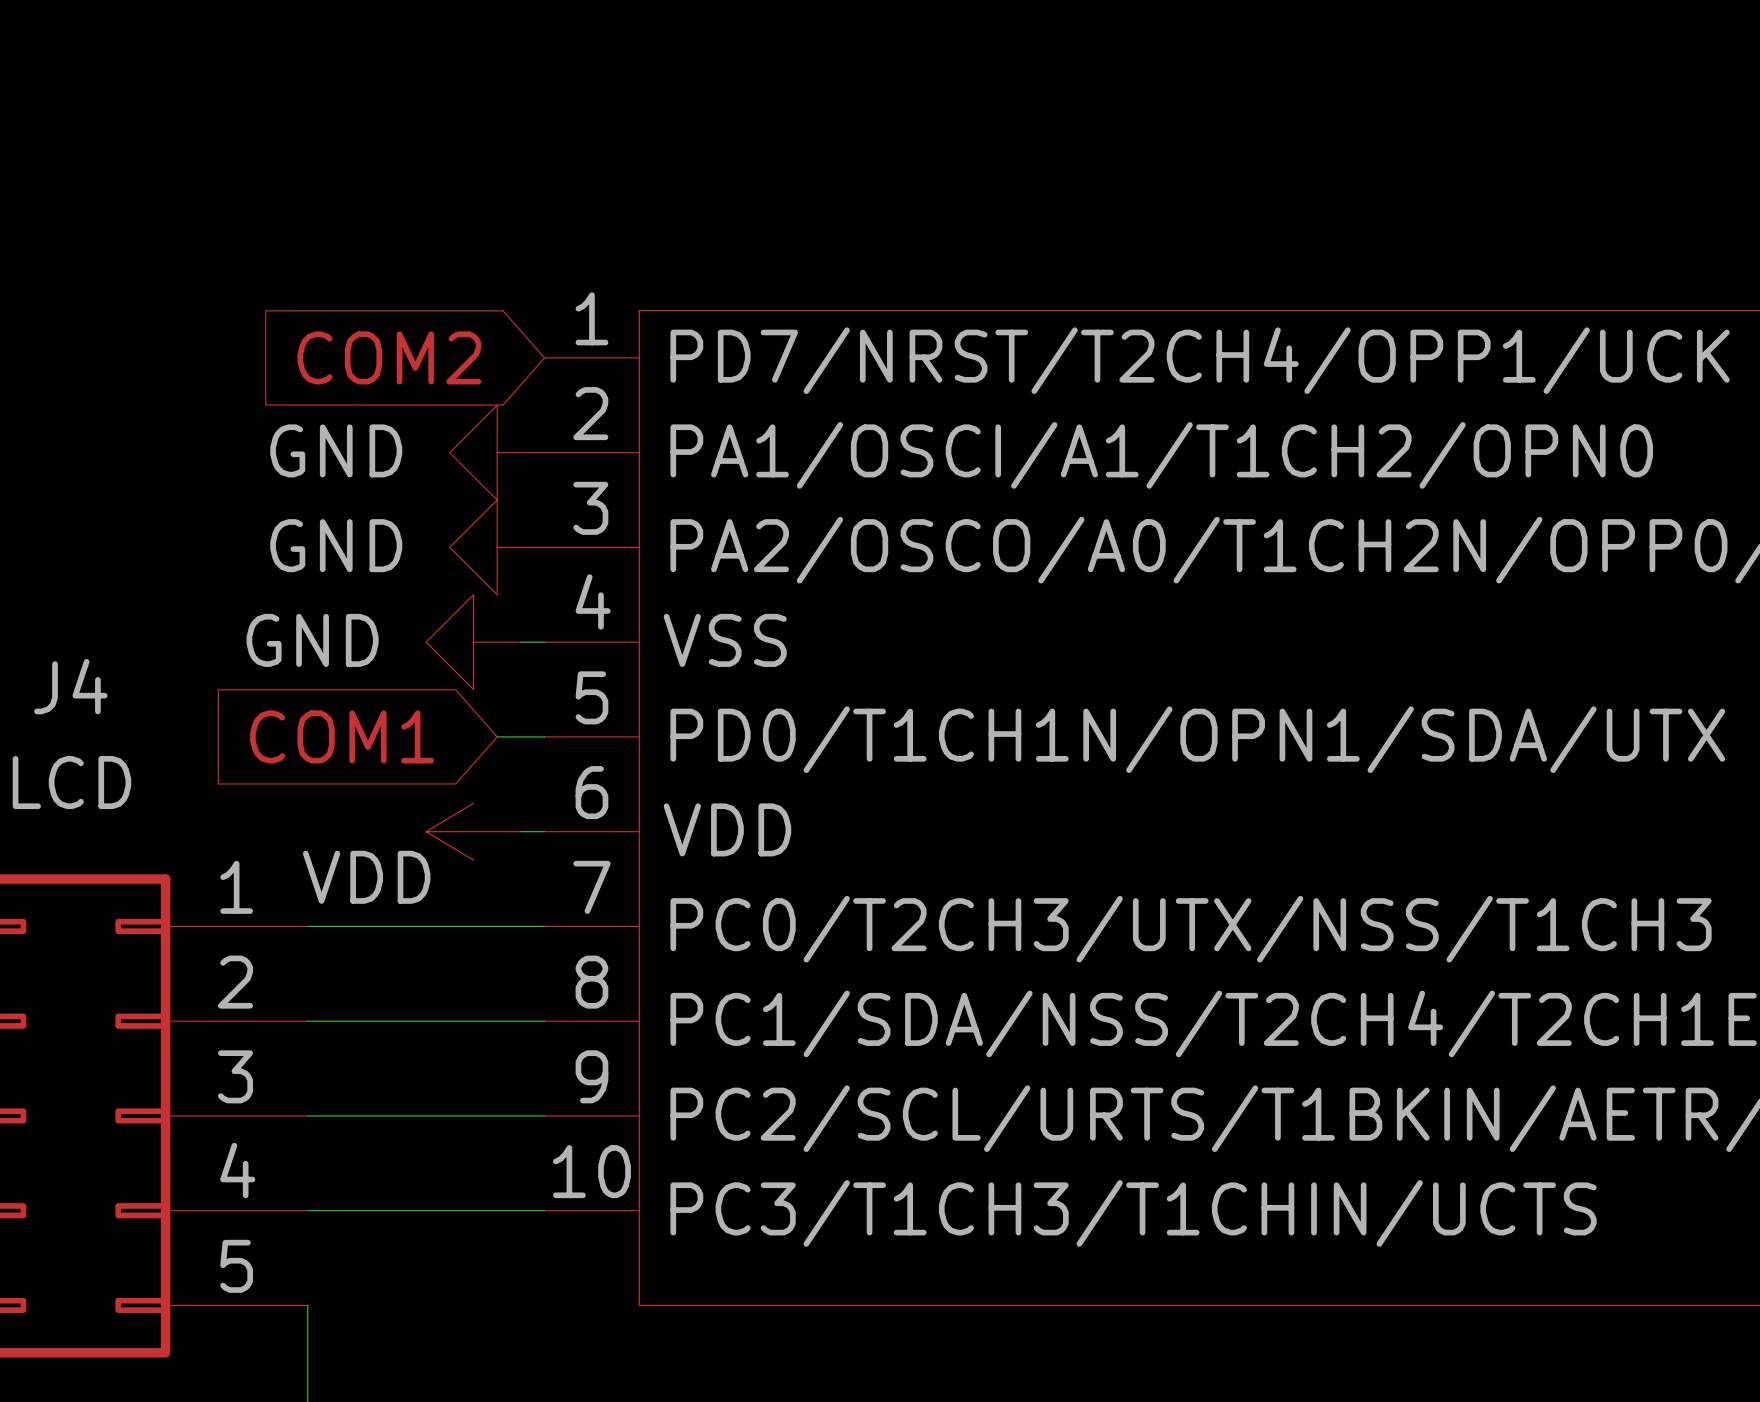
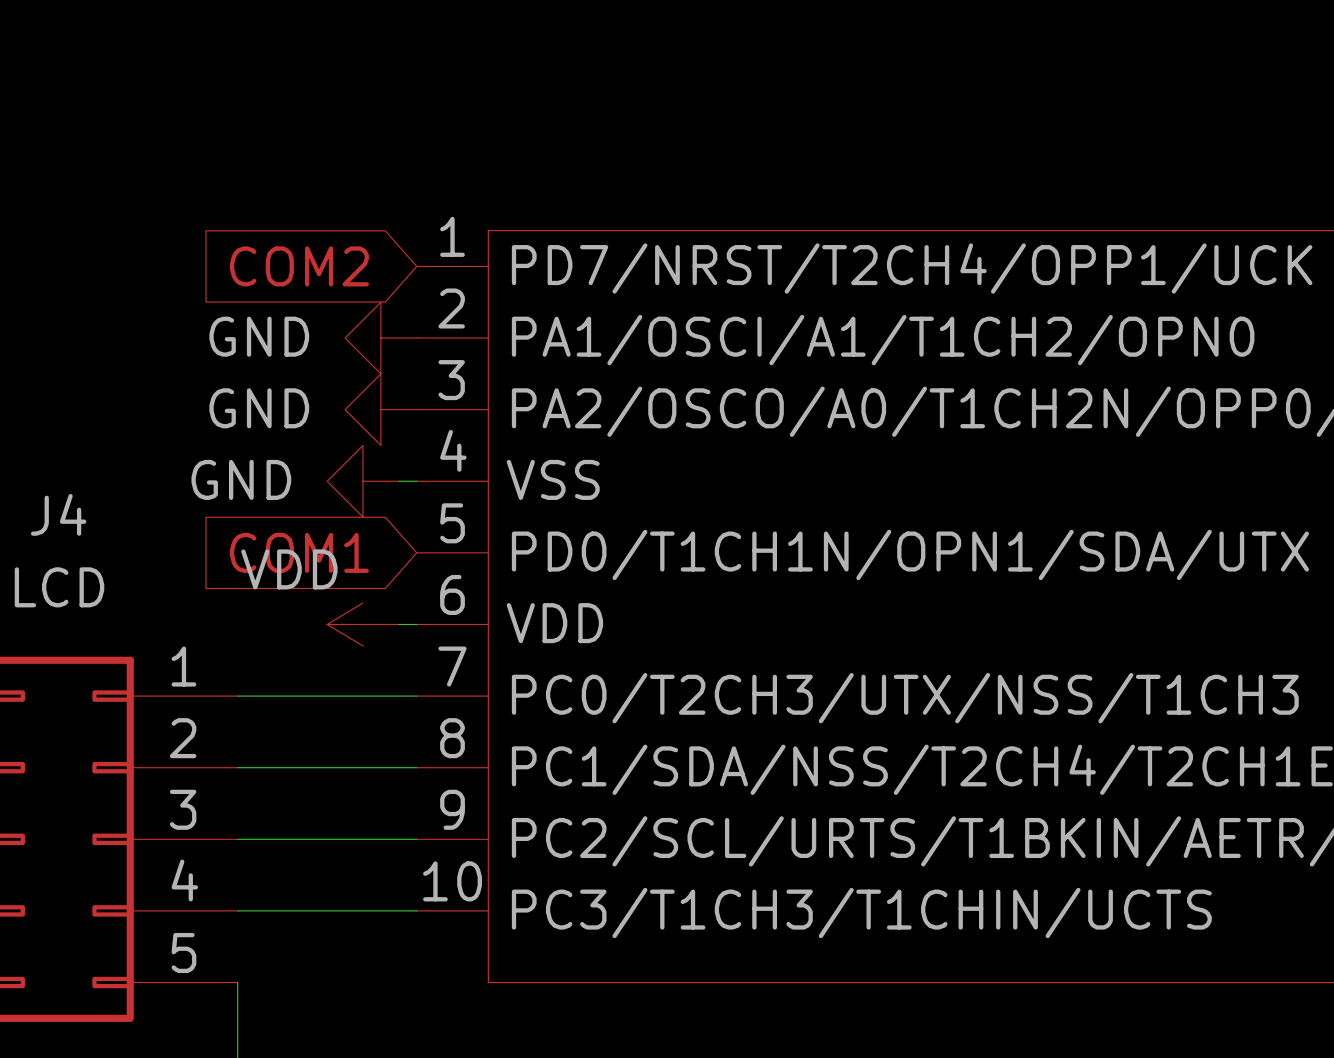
global label position: COM1 (342, 736) -> COM1 (299, 552)
wire: (497, 736) (544, 736) -> none
power symbol text position: VDD (366, 877) -> VDD (289, 569)

